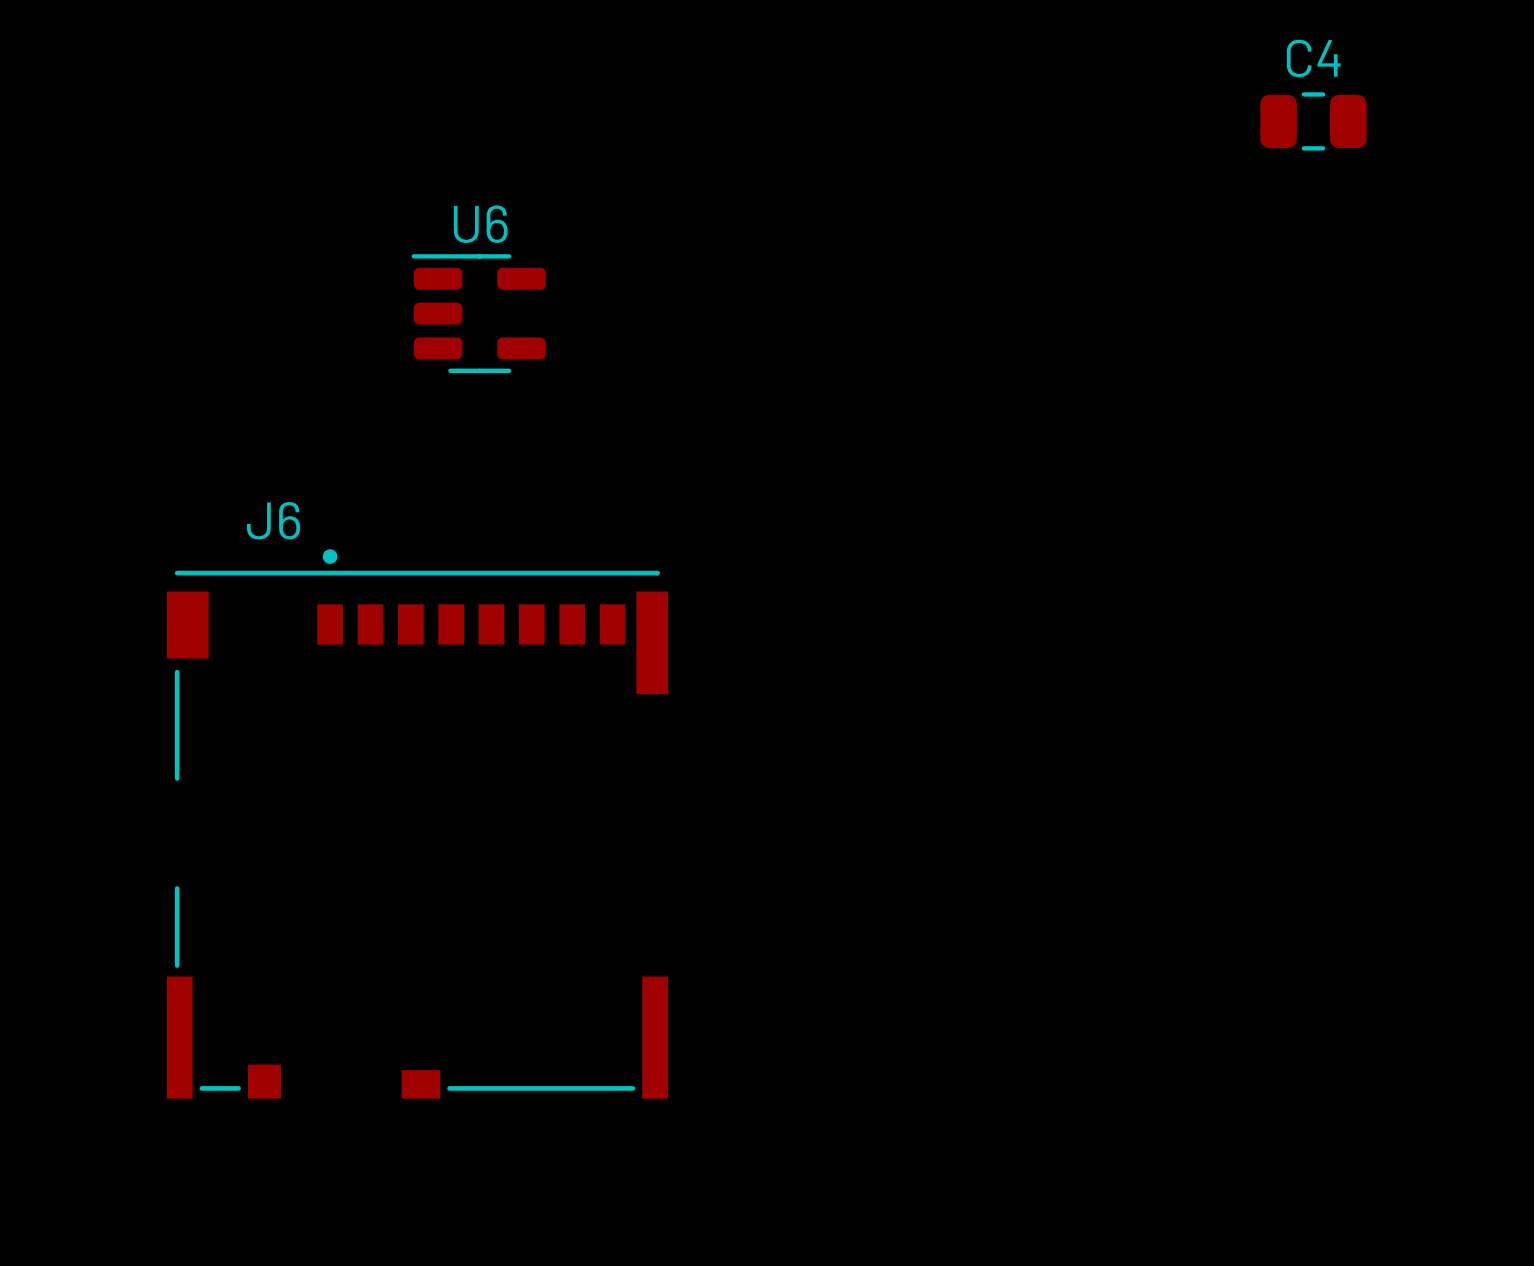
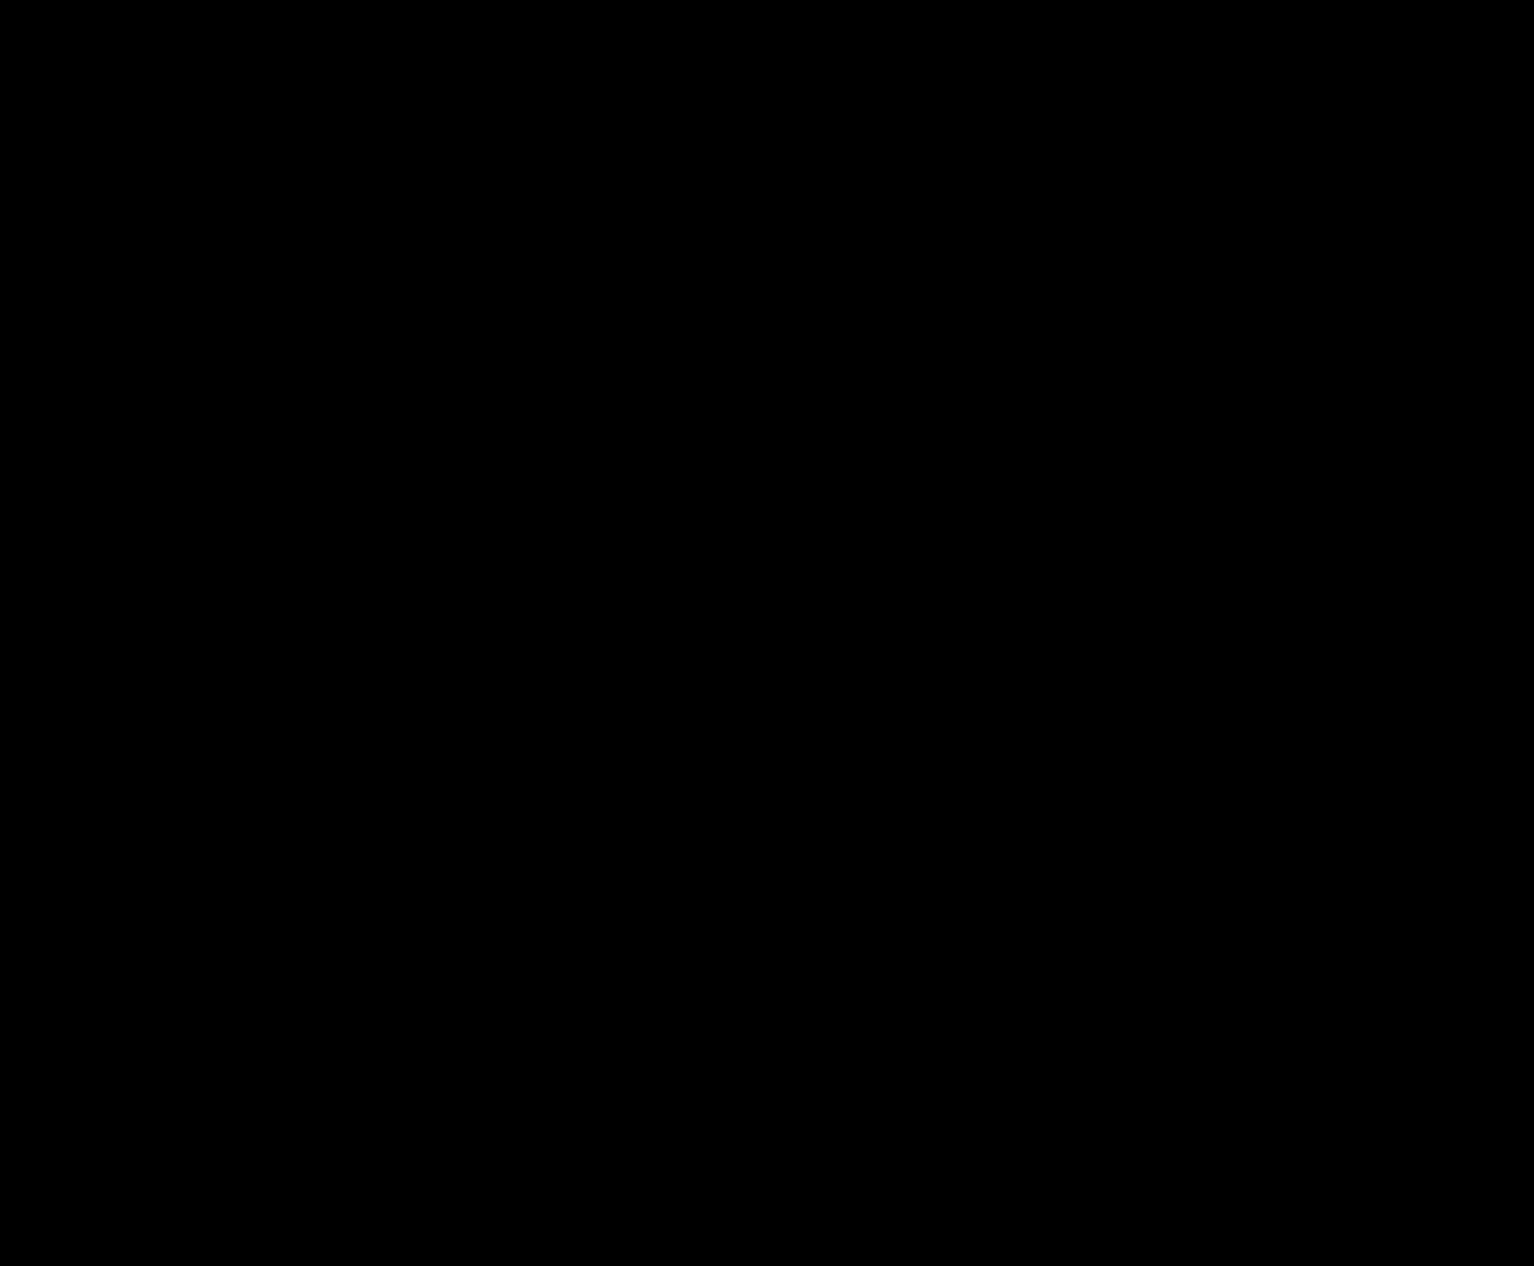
C4: (1313, 121) -> none
U6: (478, 313) -> none
J6: (417, 823) -> none

